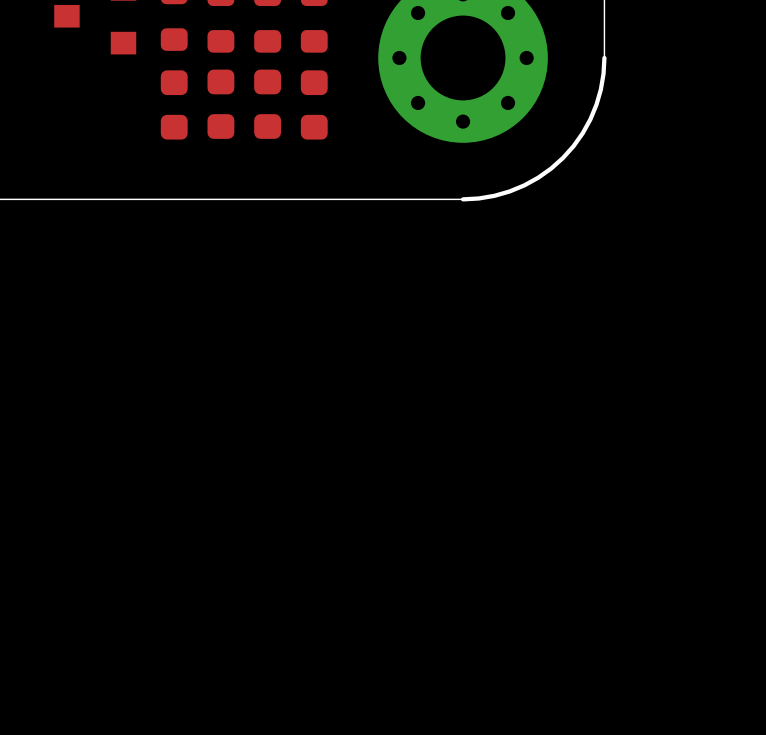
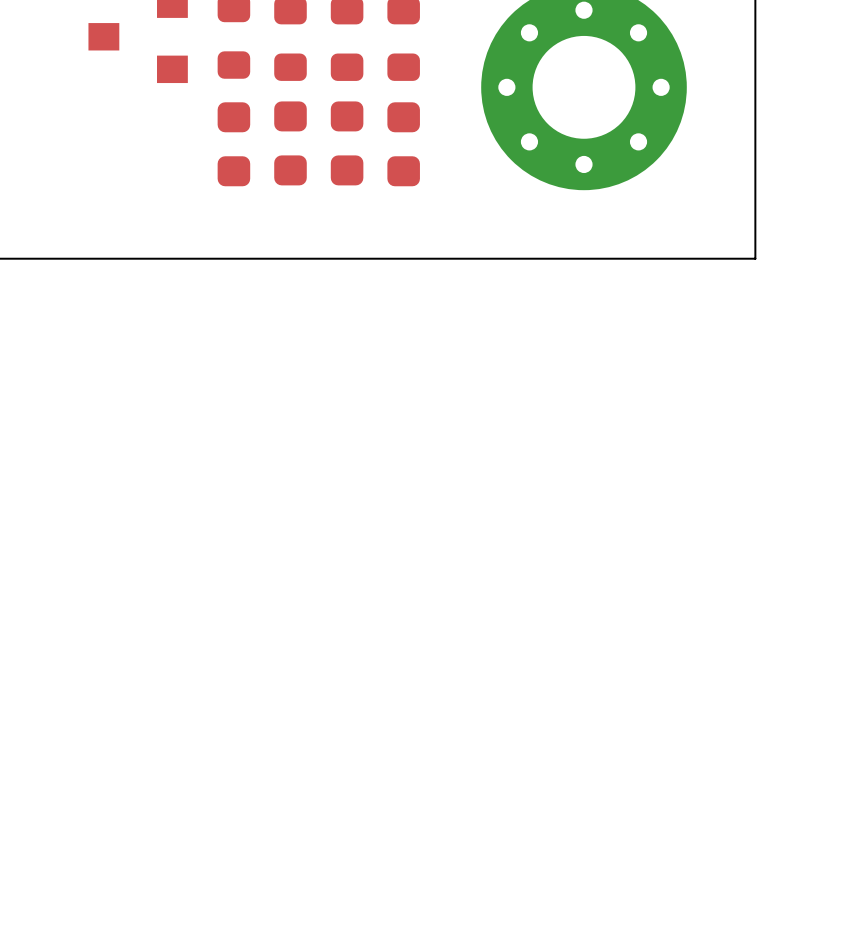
board edge: (604, 57) (600, 89) (596, 104) (582, 133) (563, 157) (538, 177) (509, 191) (478, 198) (463, 199) -> (755, 87) (755, 258) (583, 258)

